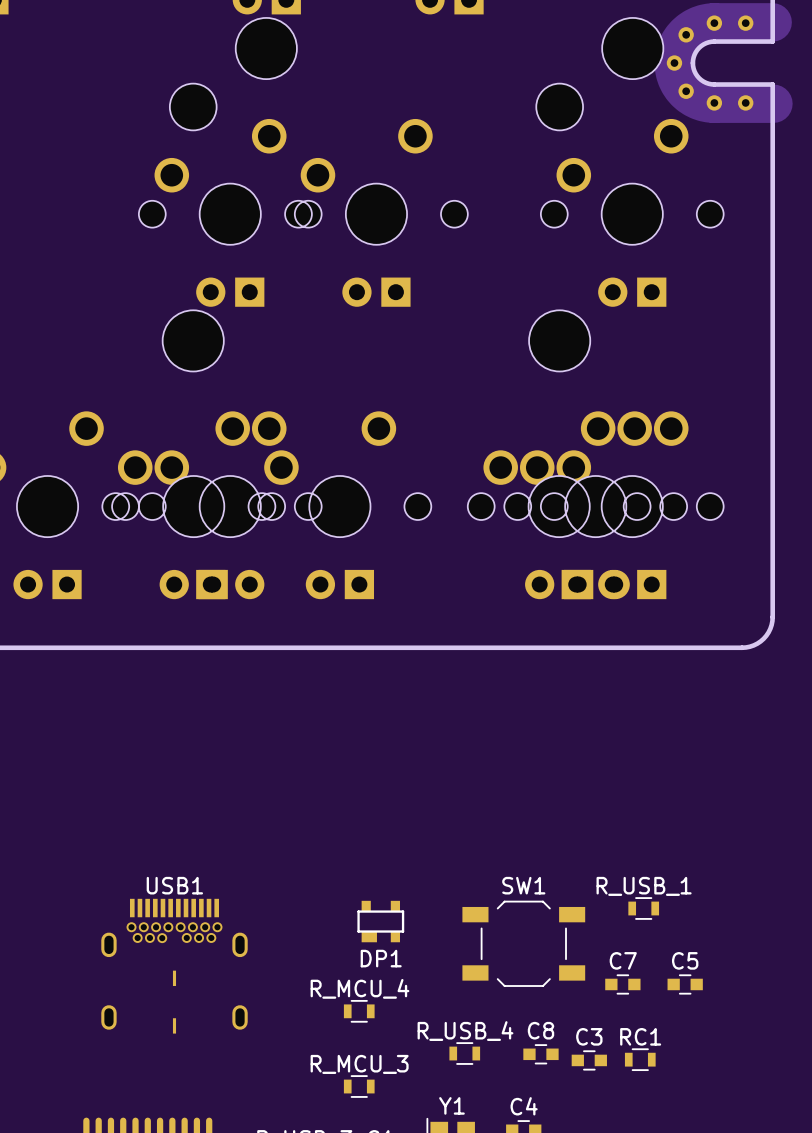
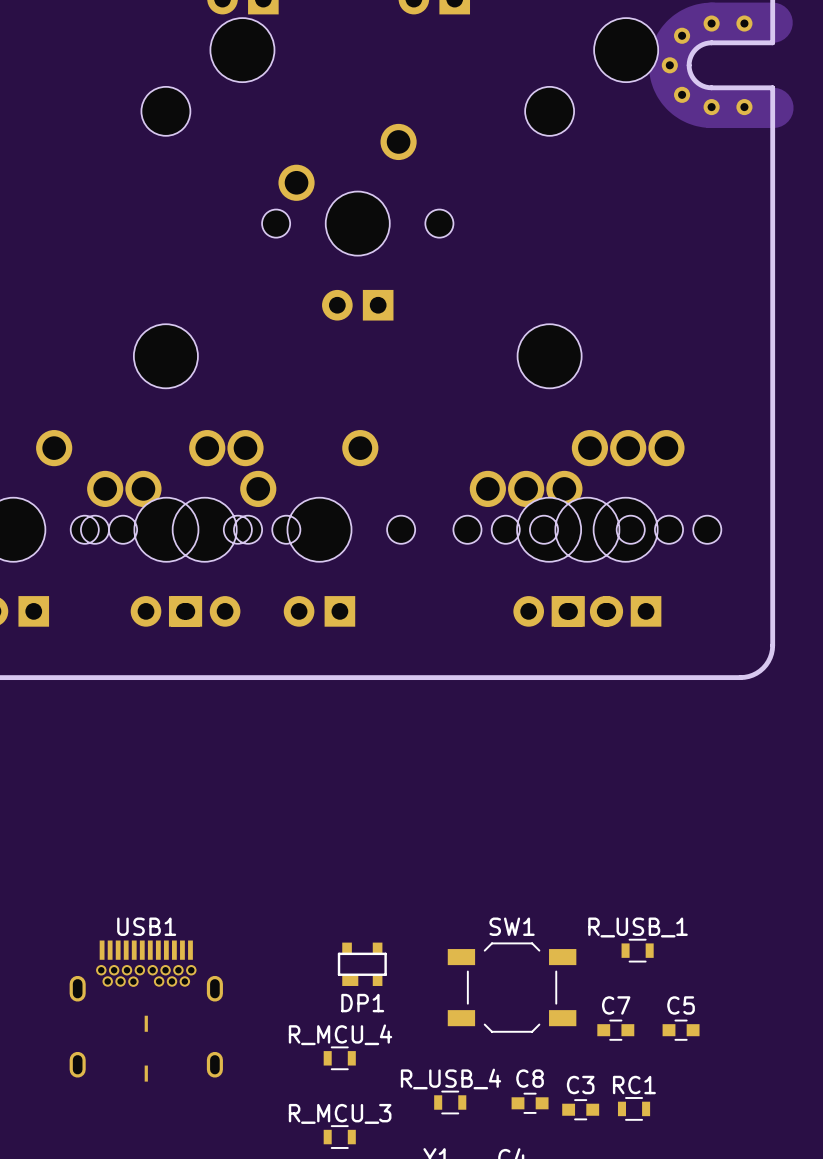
part: (230, 212) -> none
part: (632, 212) -> none

